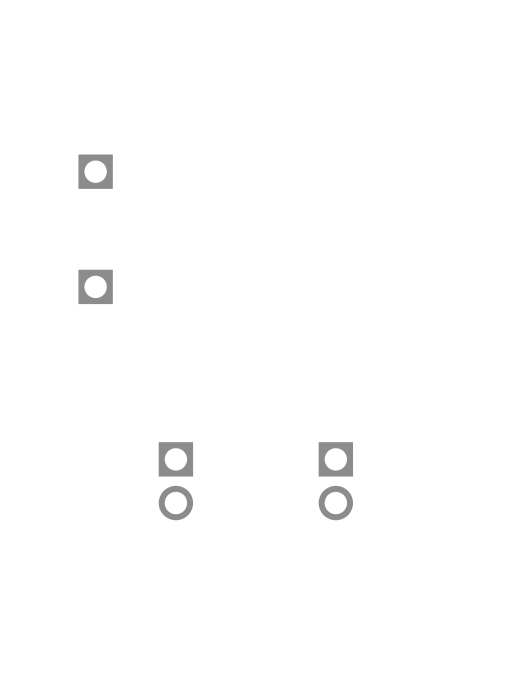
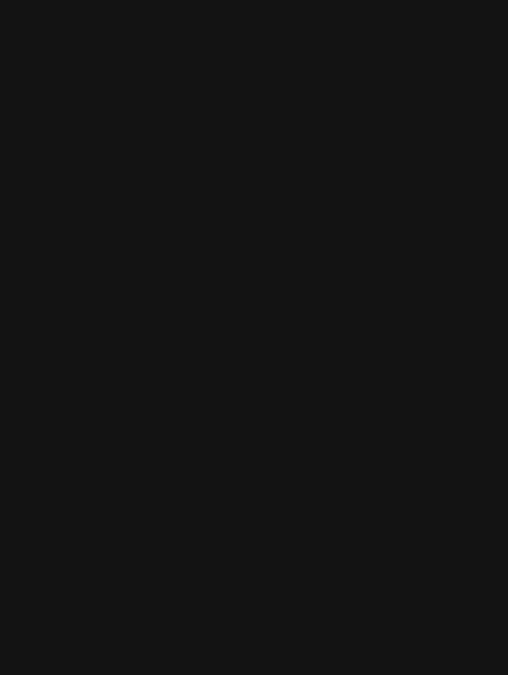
part: (95, 171) -> none
part: (95, 286) -> none
part: (175, 481) -> none
part: (335, 481) -> none

